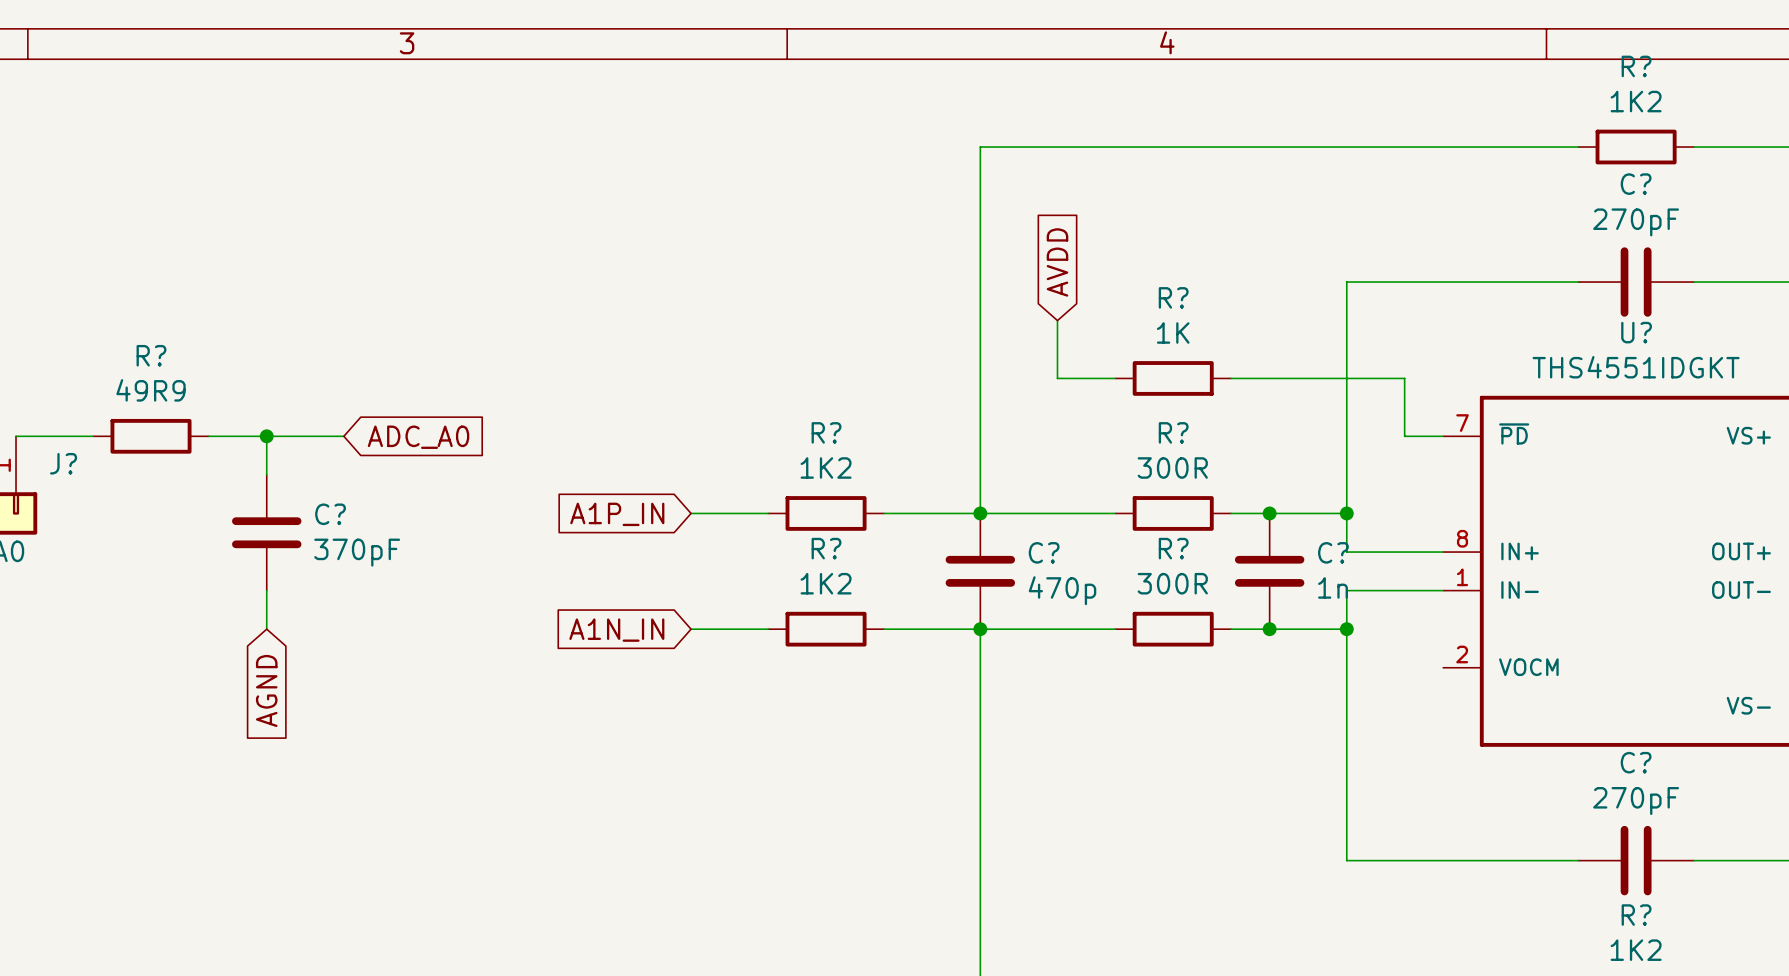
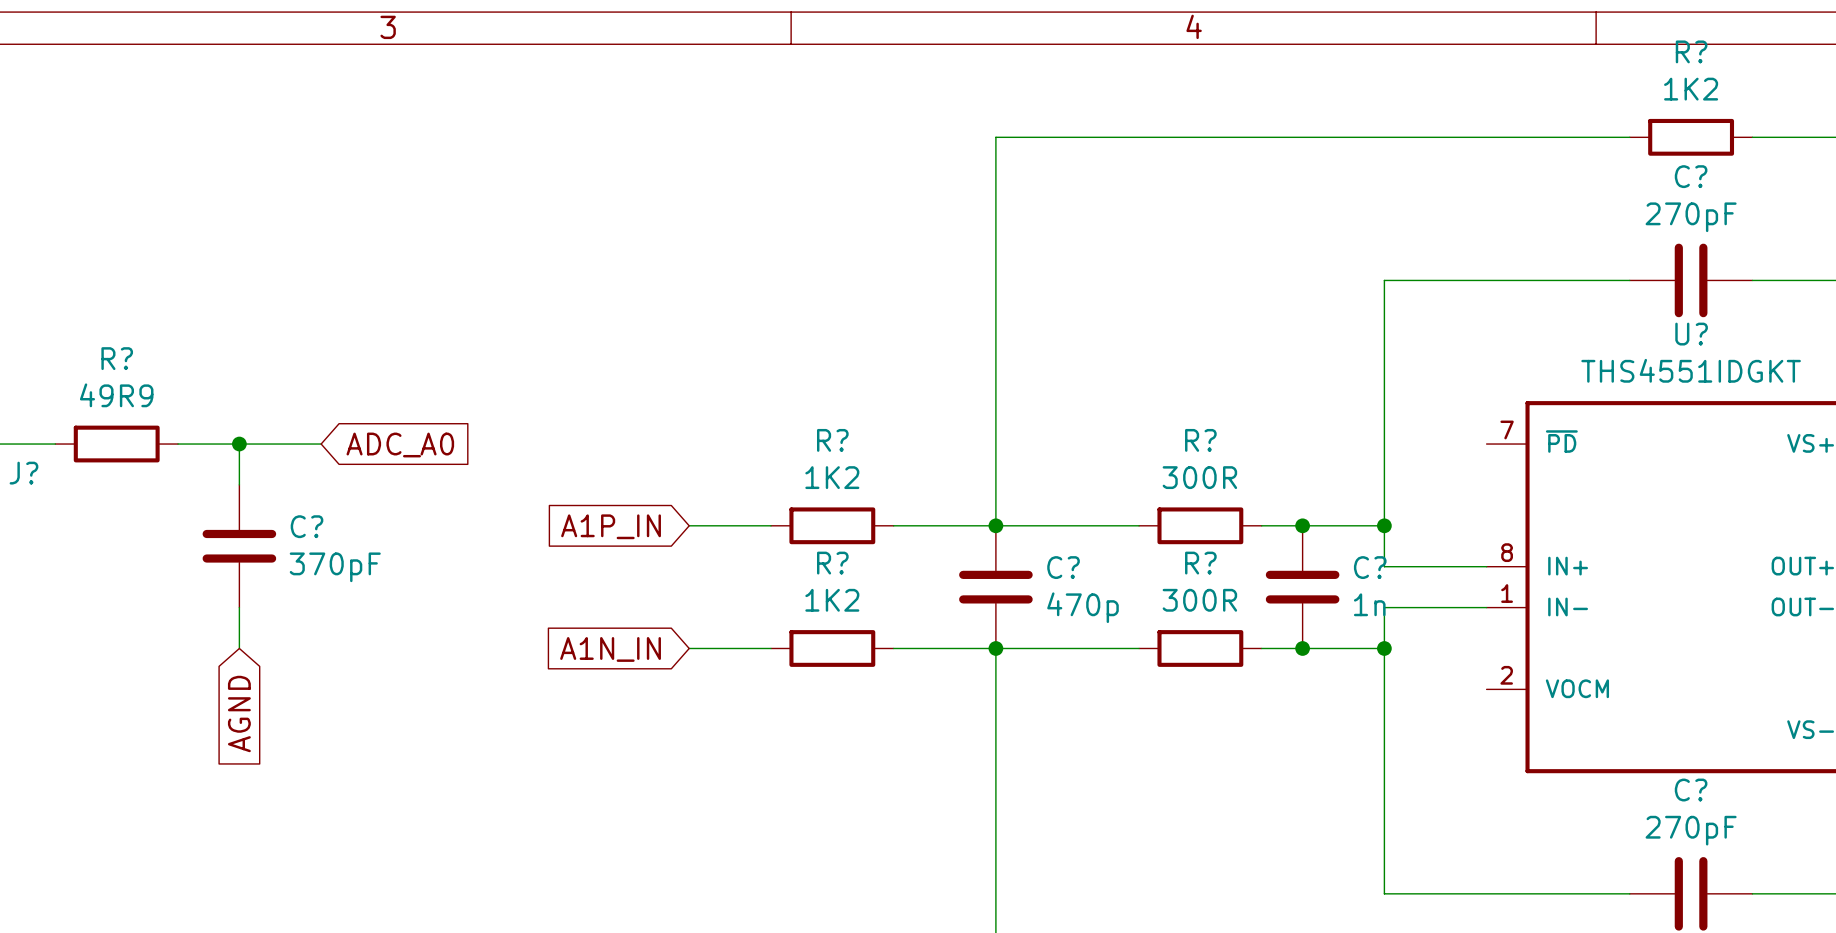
global label: AVDD (1057, 262) -> none
wire: (1057, 320) (1057, 378) (1115, 378) -> none
R?: 1K (1173, 378) -> none
wire: (1231, 378) (1404, 378) (1404, 436) (1443, 436) -> none

